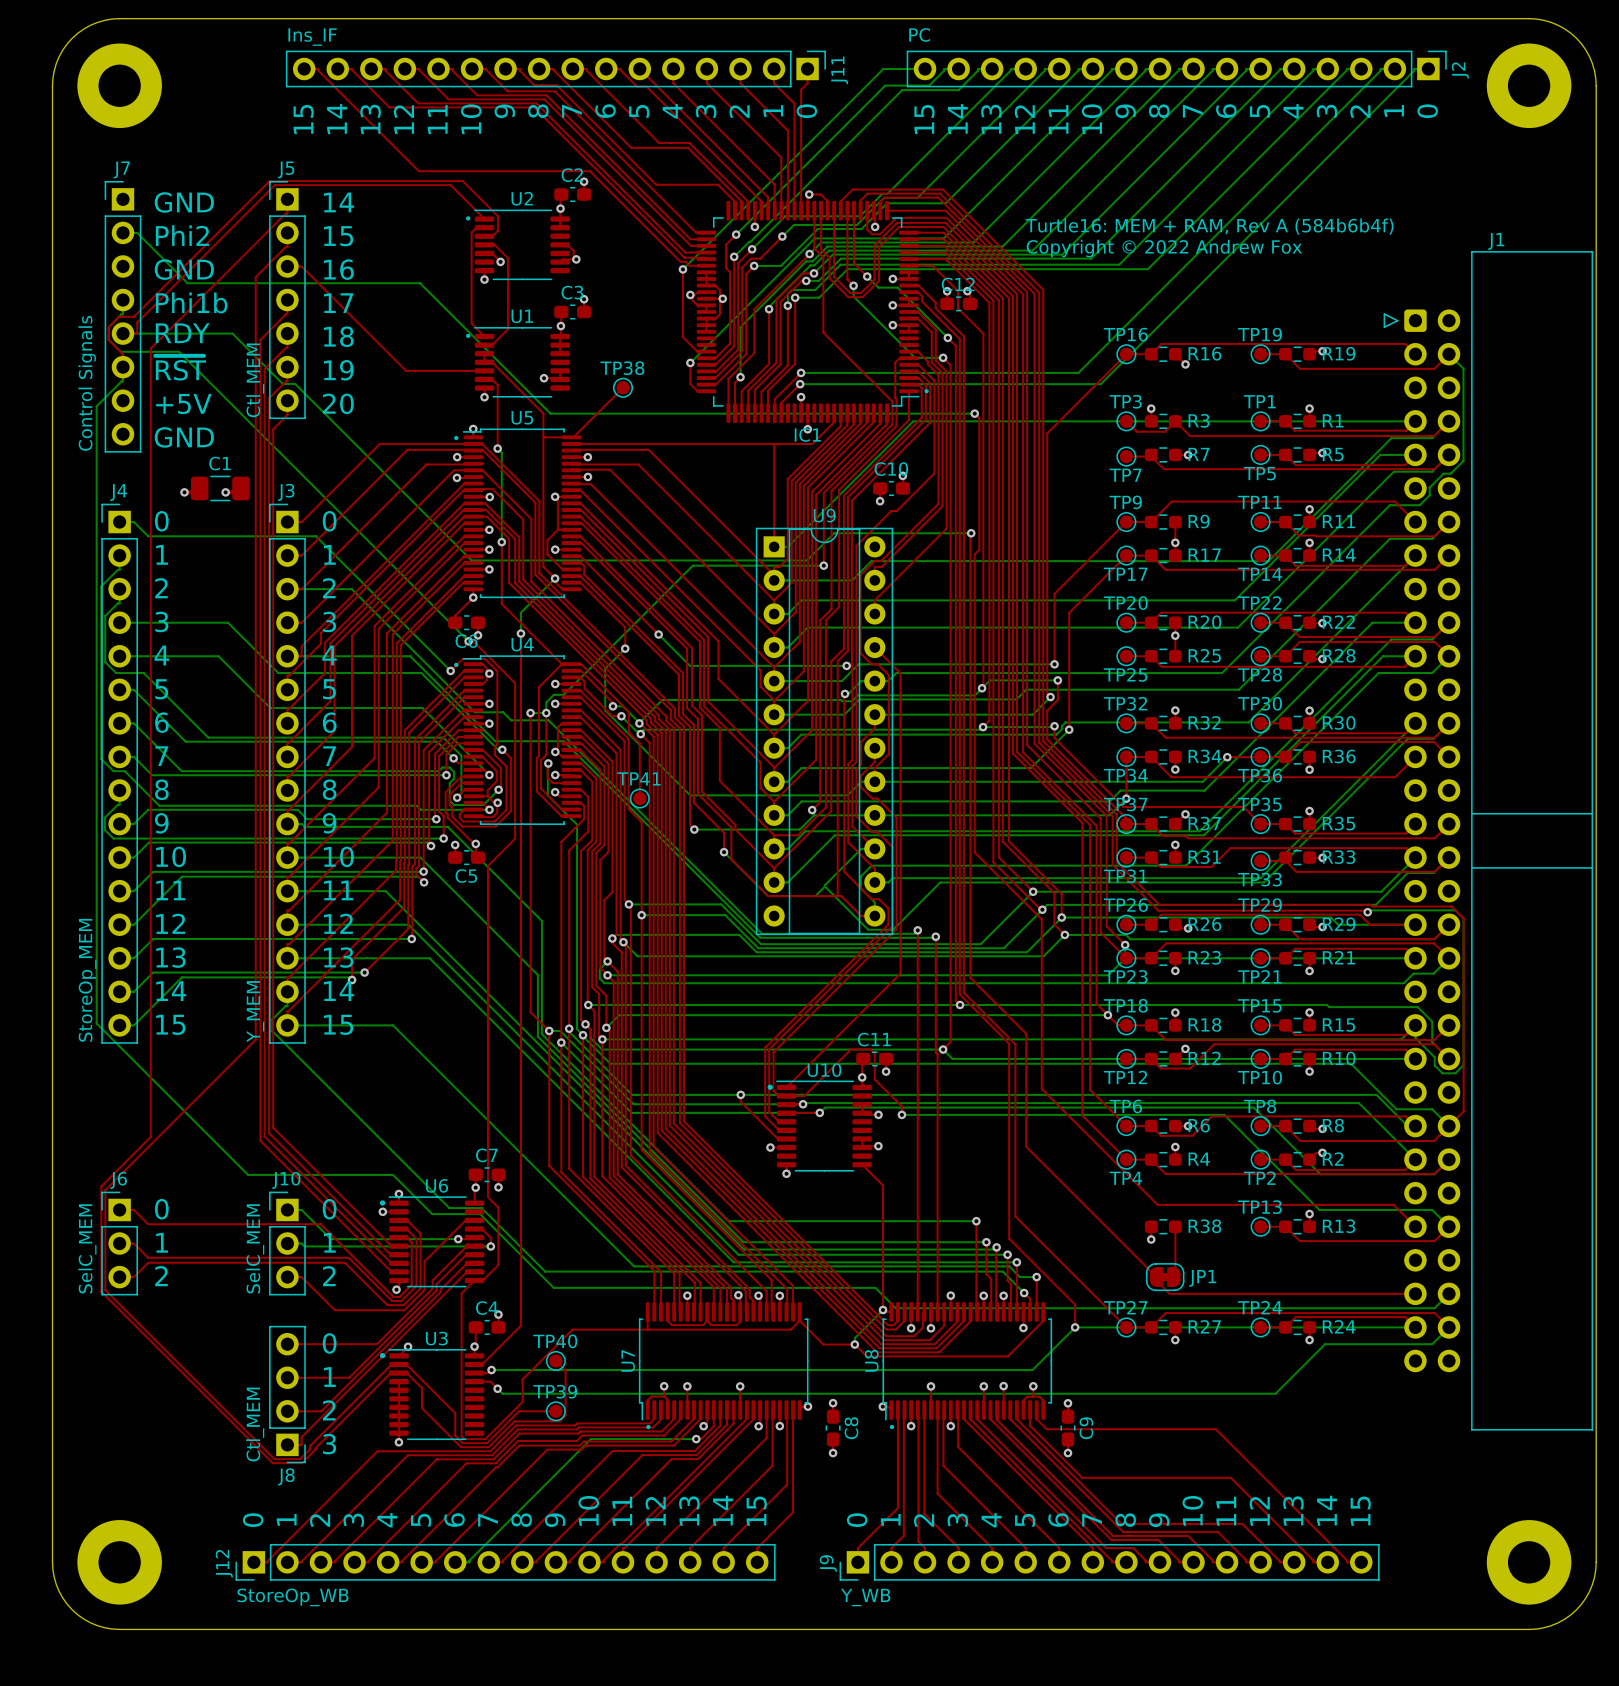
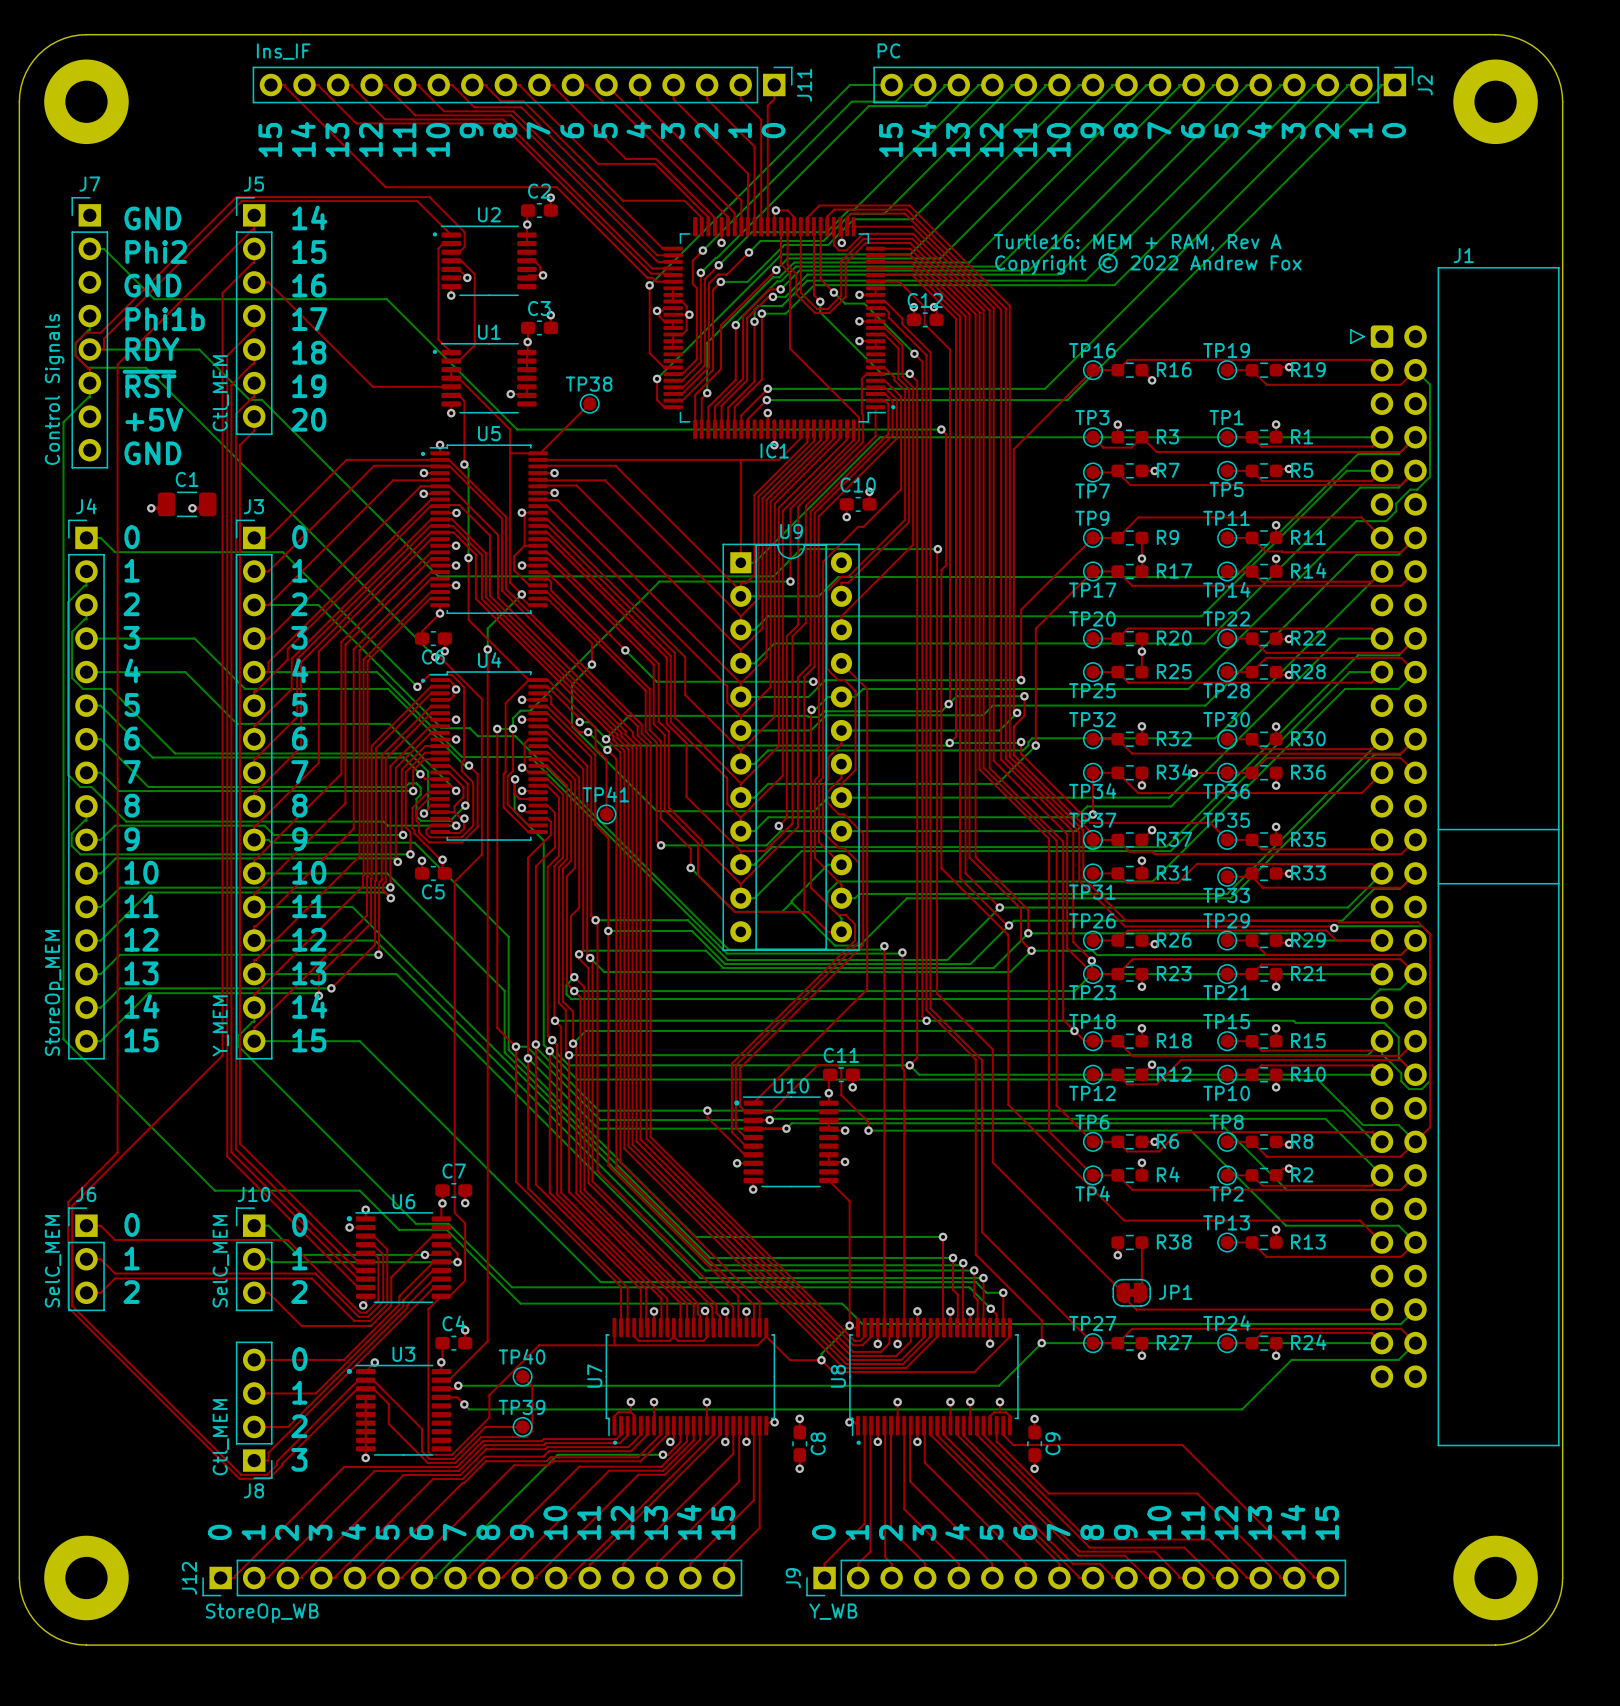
text: Turtle16: MEM + RAM, Rev A (584b6b4f) (1209, 226) -> Turtle16: MEM + RAM, Rev A (1137, 242)

